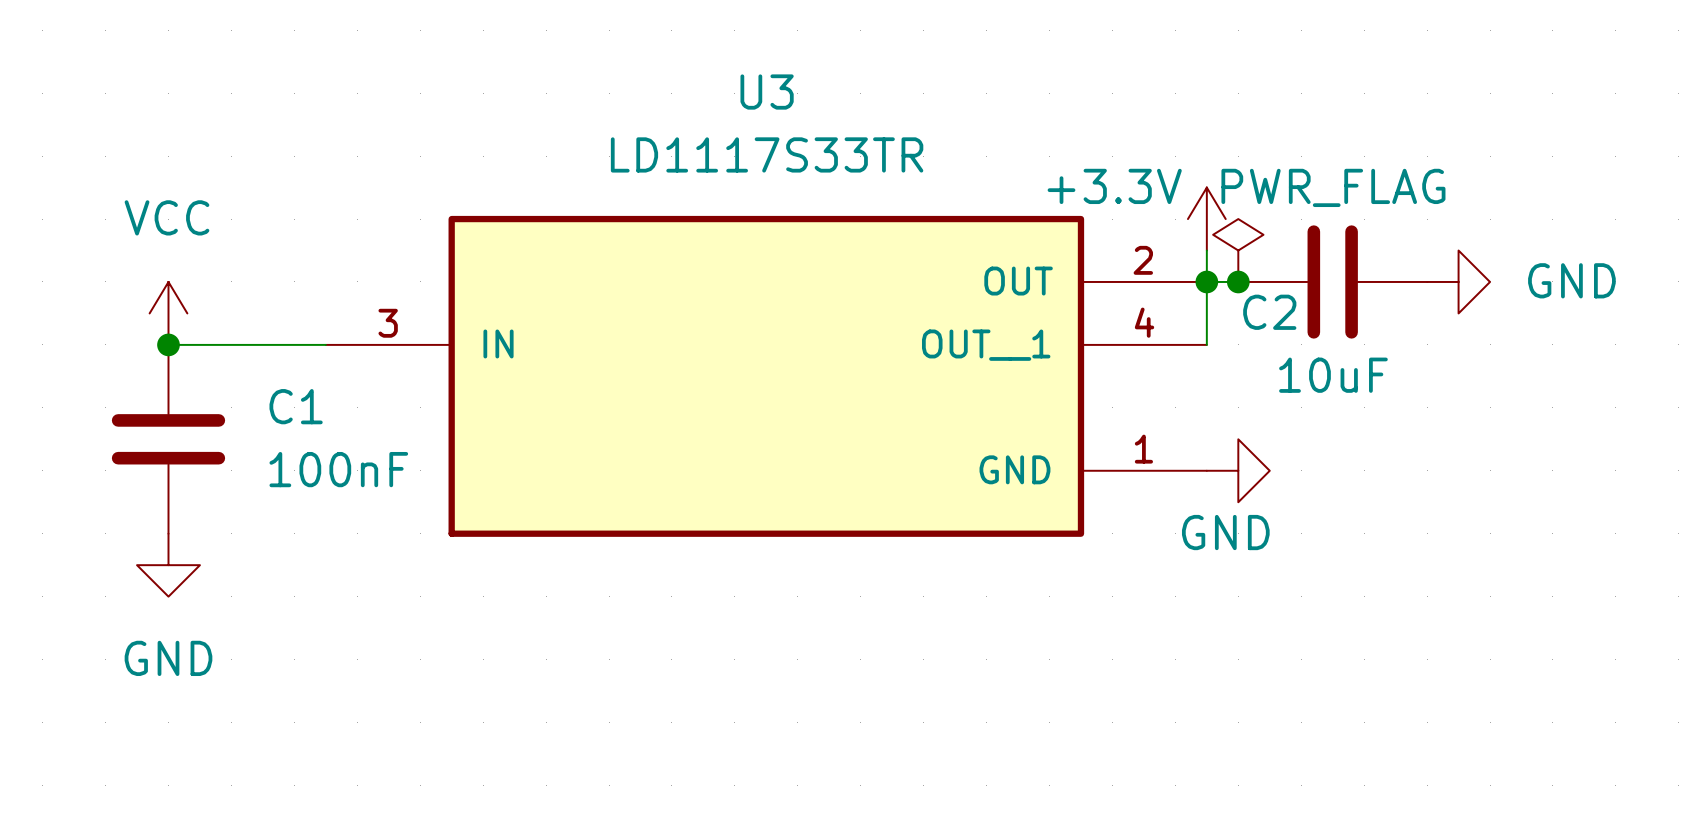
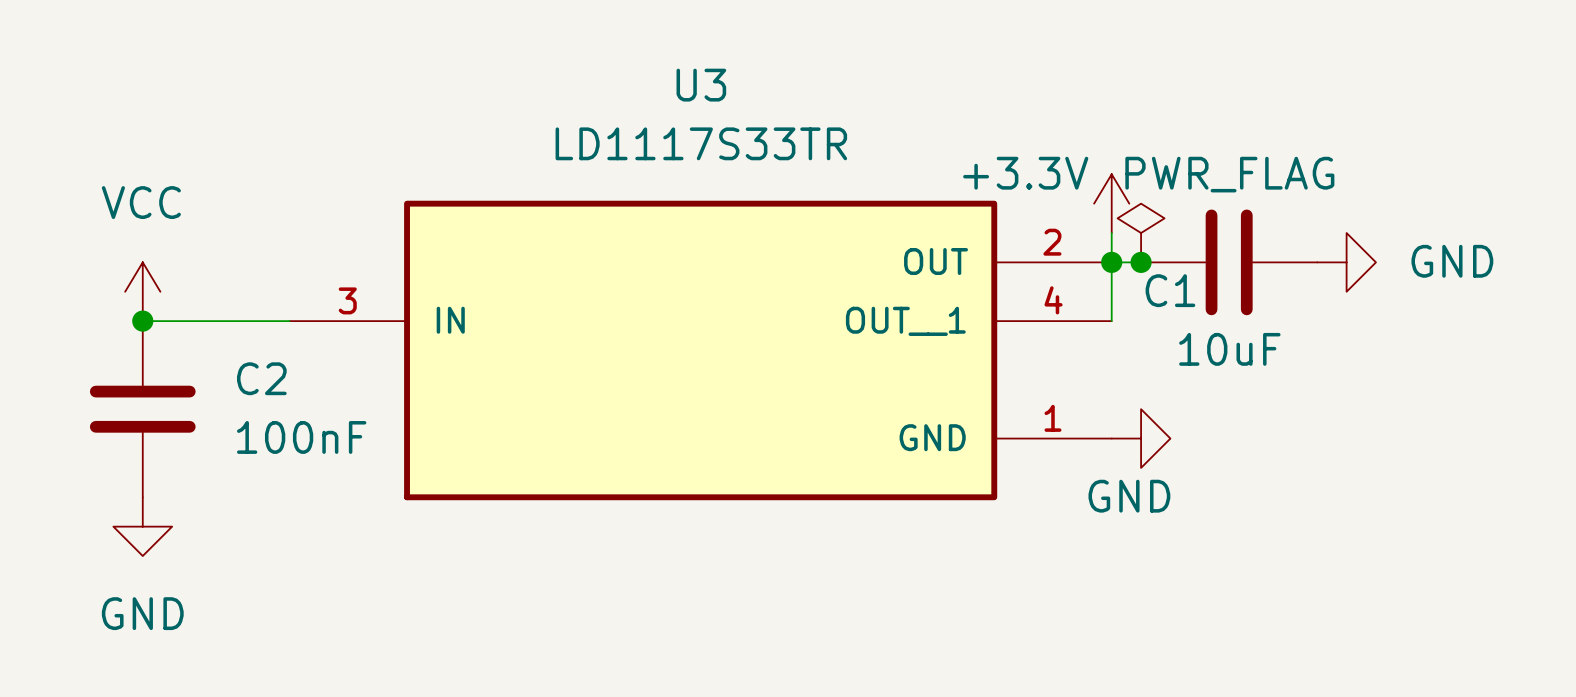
C2 name: C2 (1269, 312) -> C1 (1170, 290)
C1 name: C1 (296, 406) -> C2 (261, 378)

